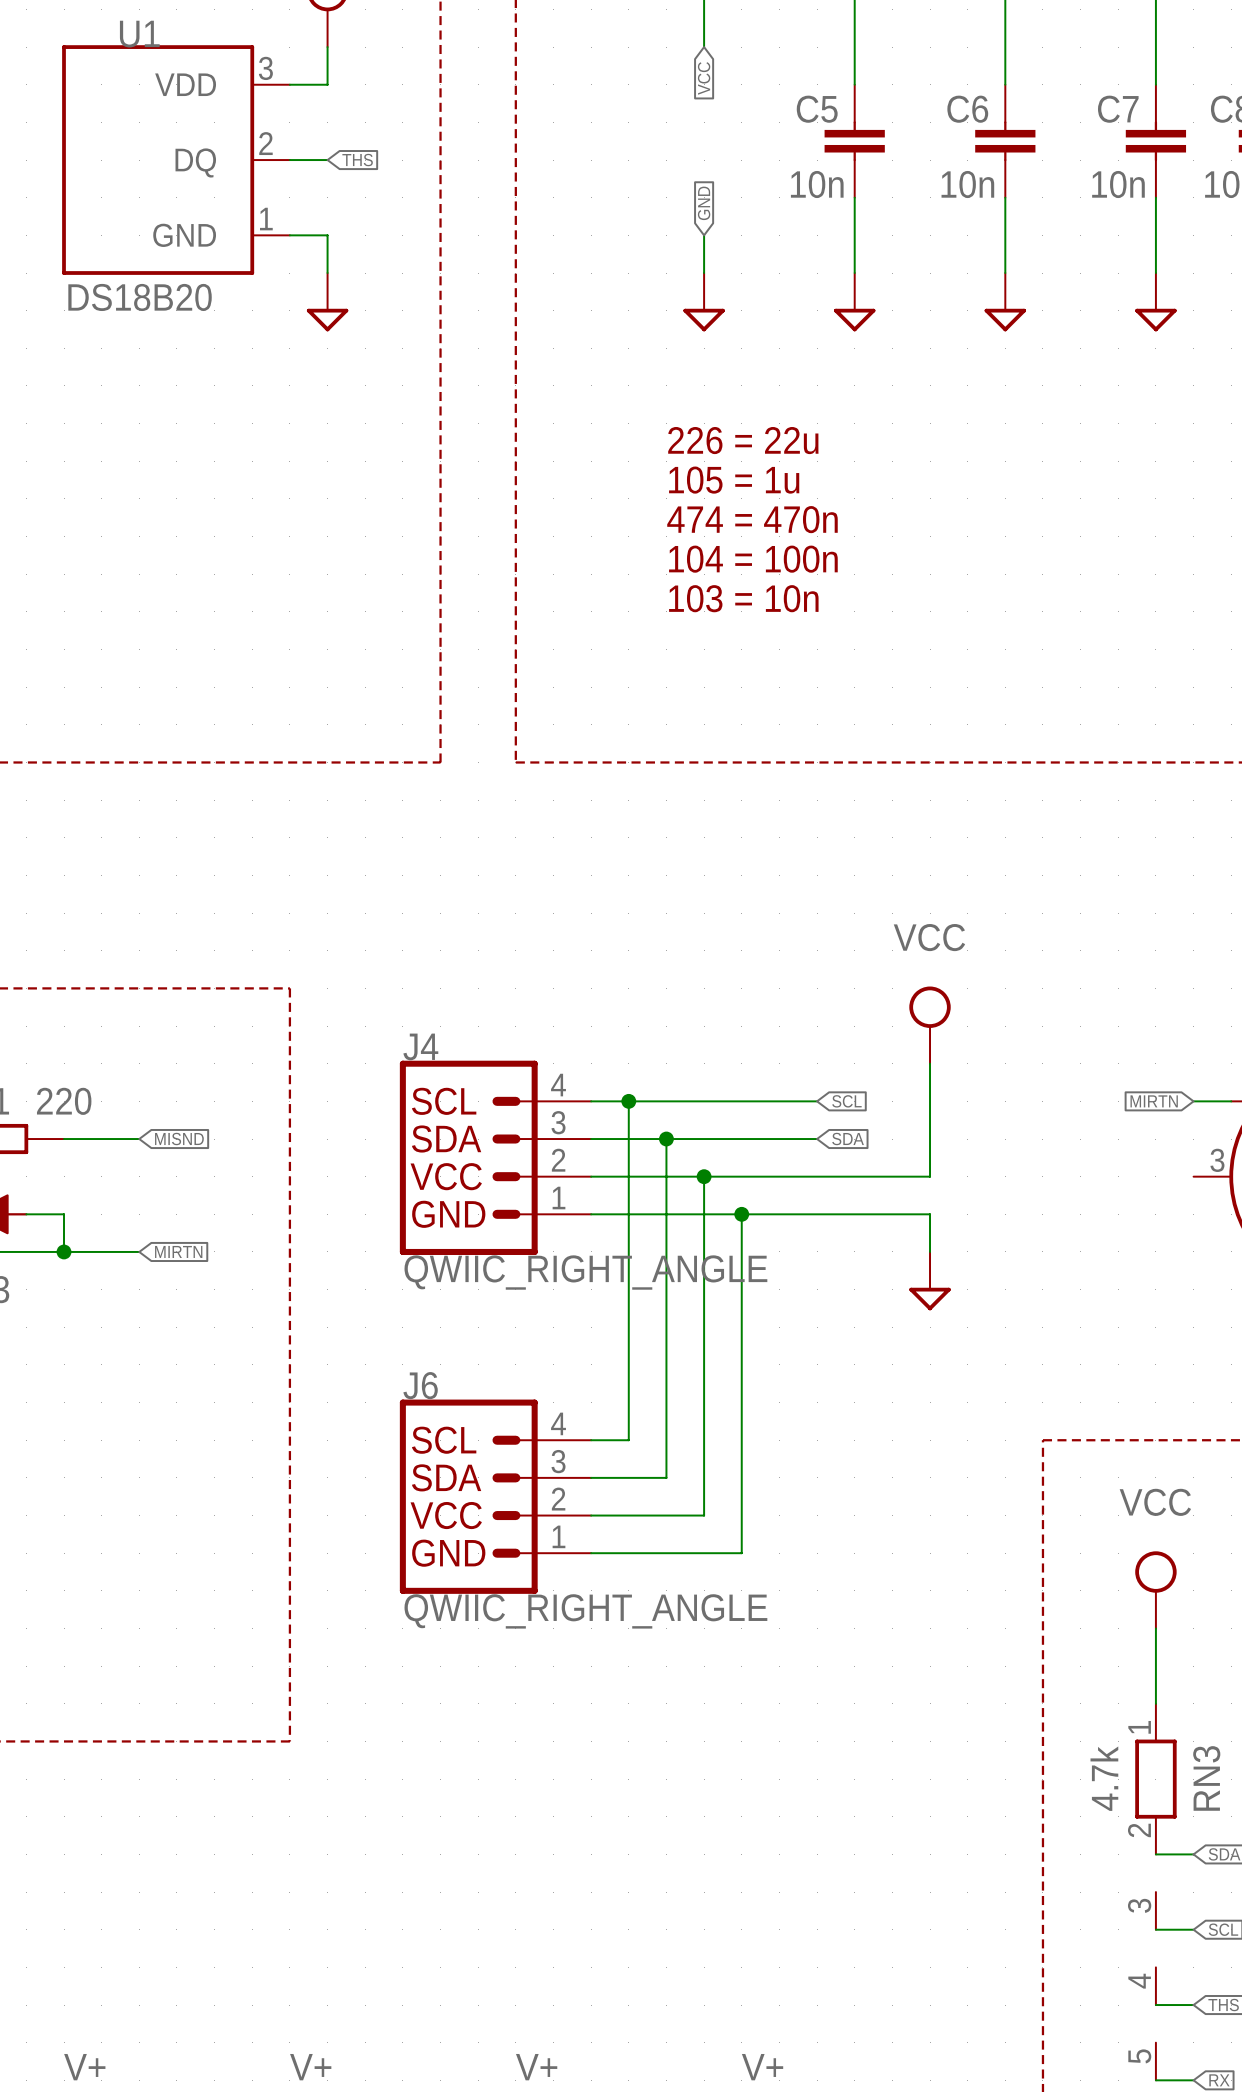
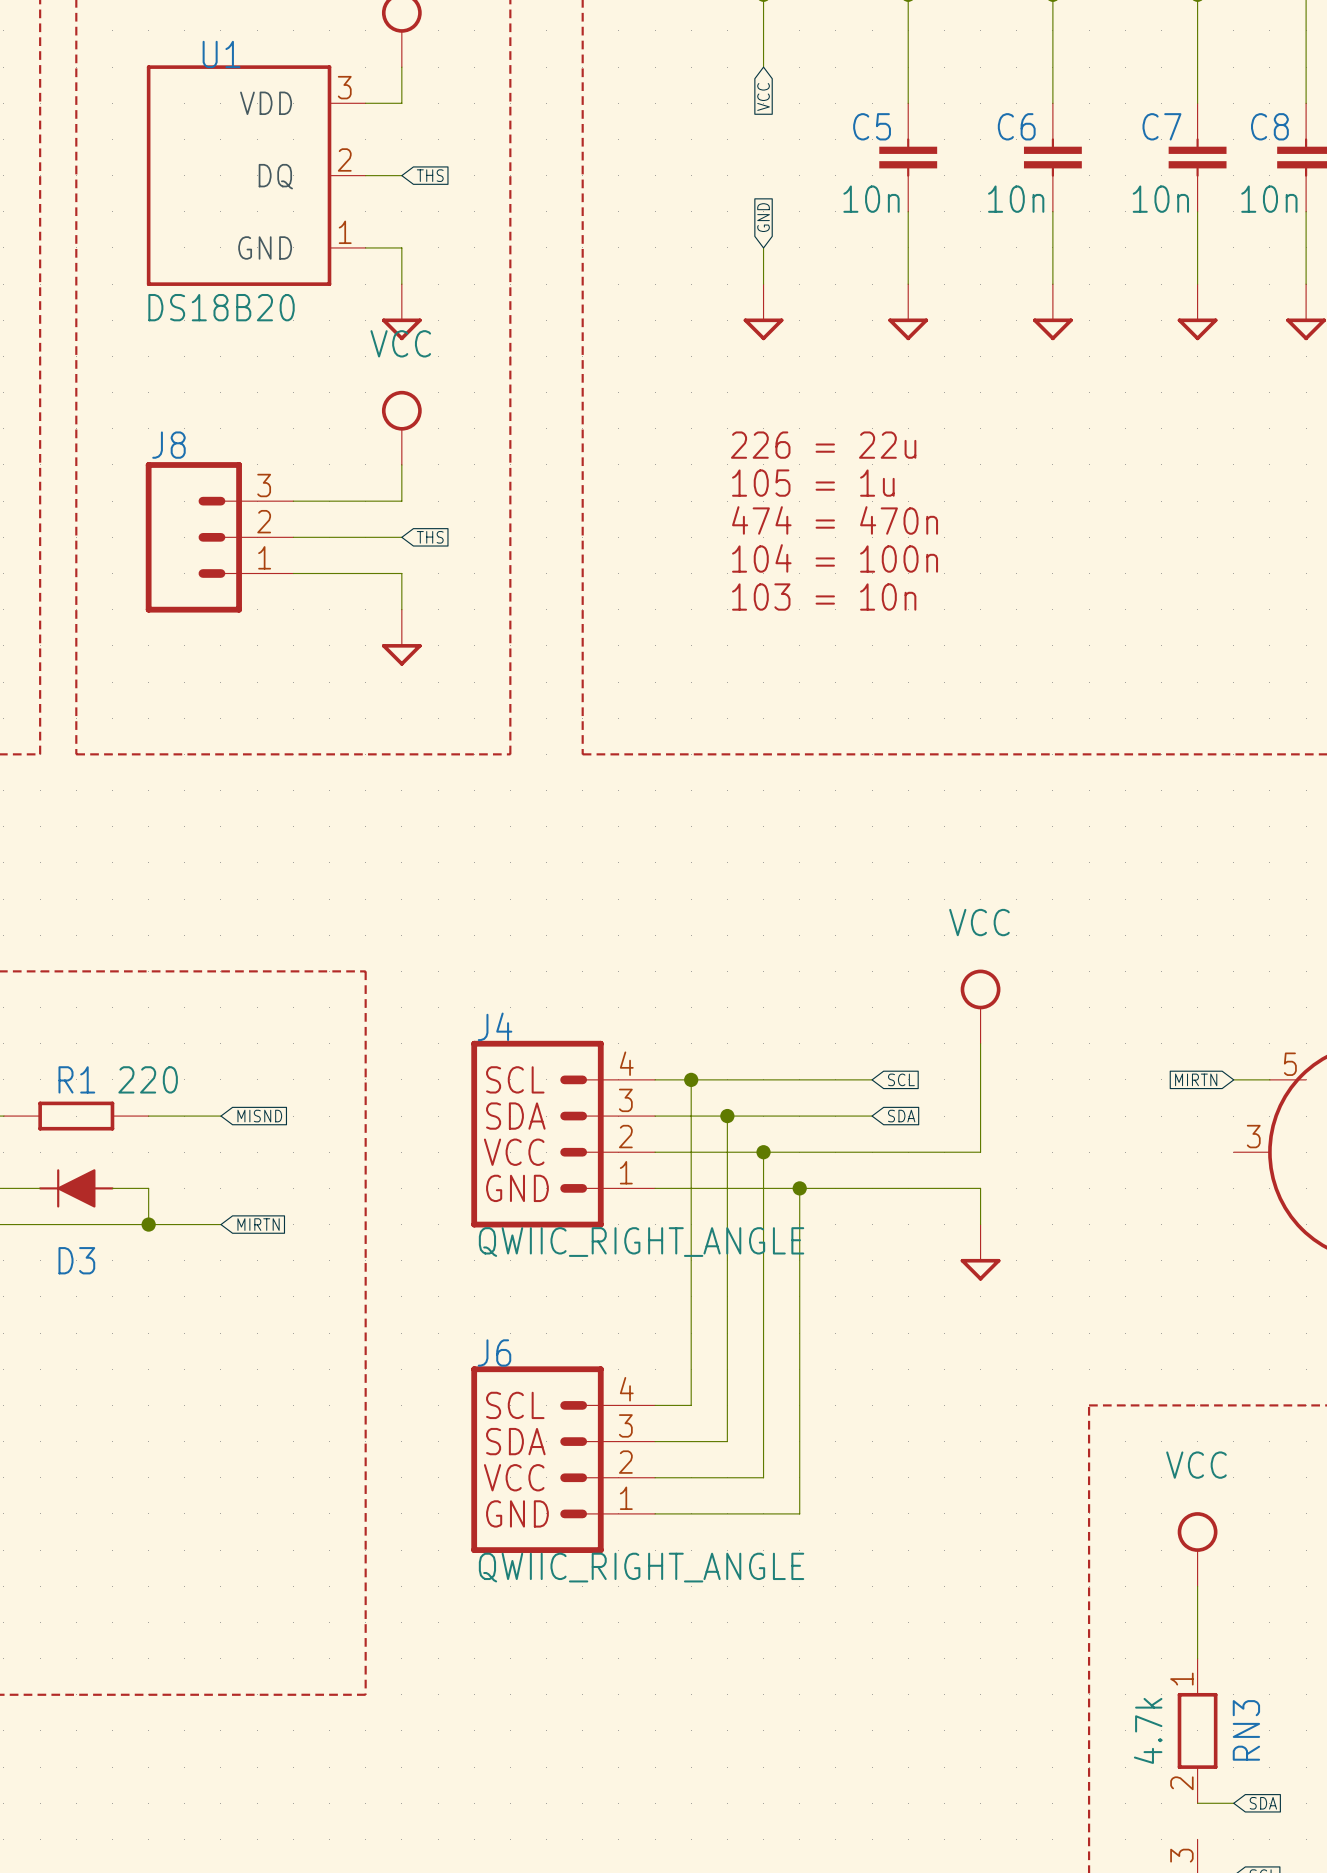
power symbol: none -> VCC (401, 427)
wire: none -> (401, 464) (401, 501) (293, 501)
J8: none -> (219, 537)
wire: none -> (293, 537) (401, 537)
global label: none -> THS (430, 537)
wire: none -> (293, 573) (401, 573) (401, 609)
power symbol: none -> (401, 637)

